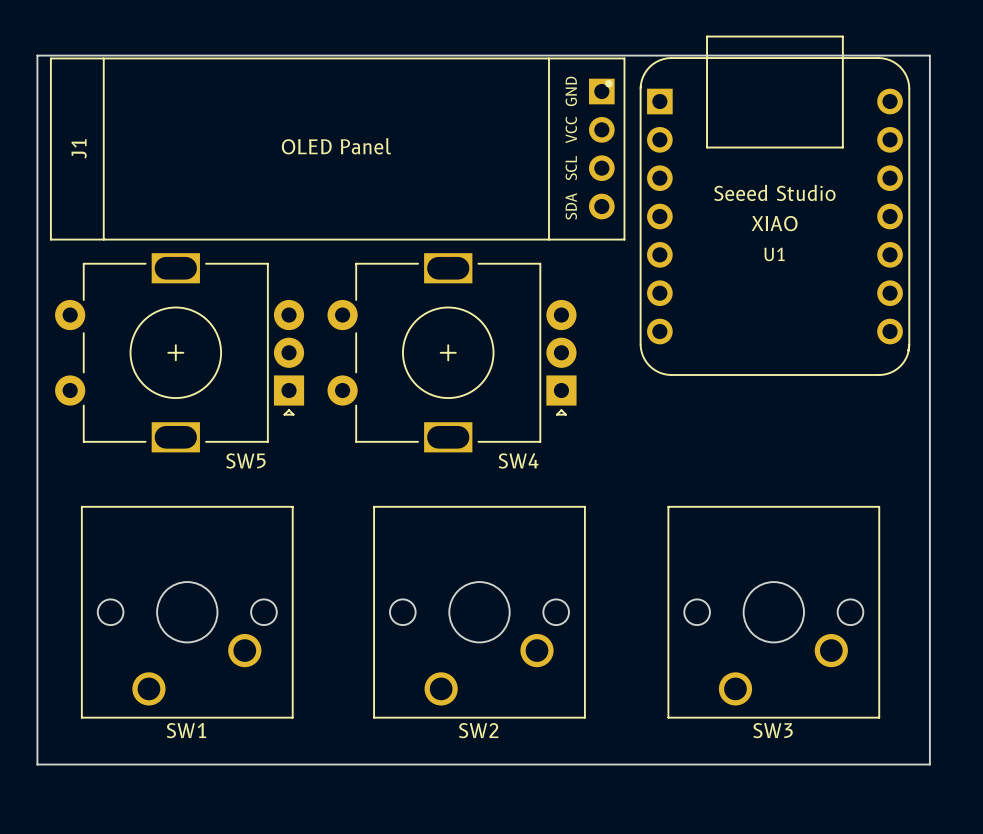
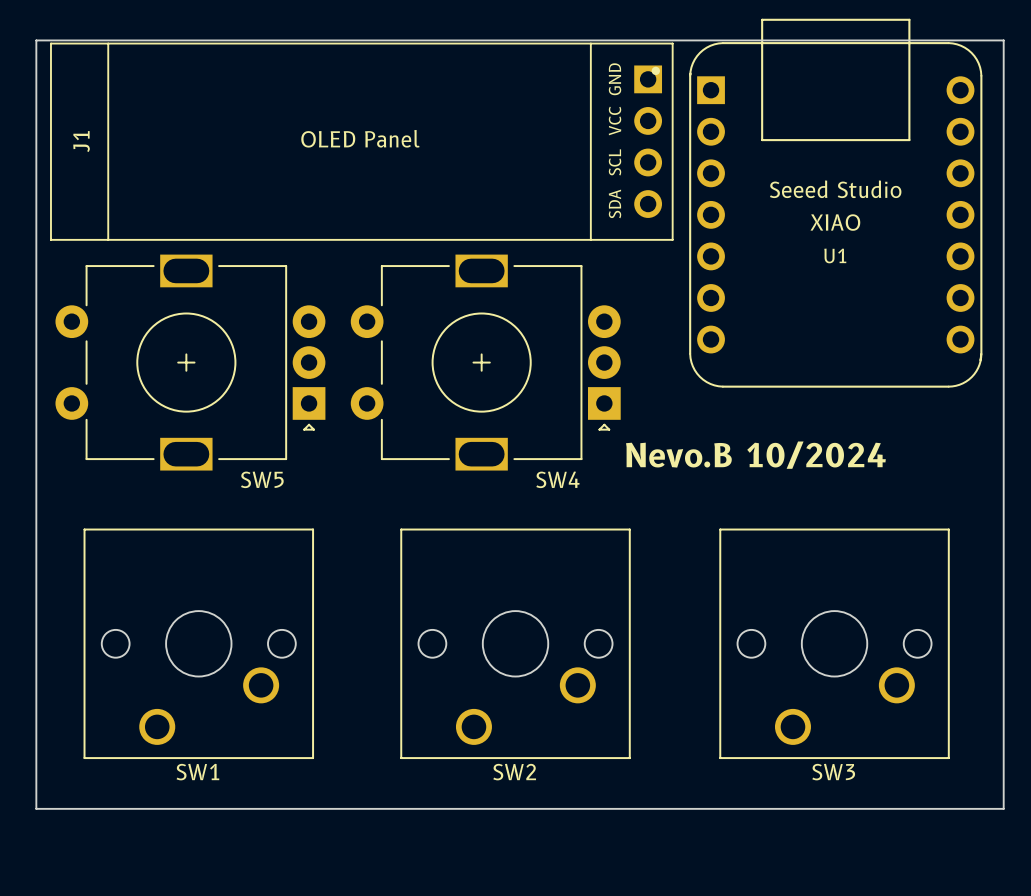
text: none -> Nevo.B 10/2024 (755, 455)

